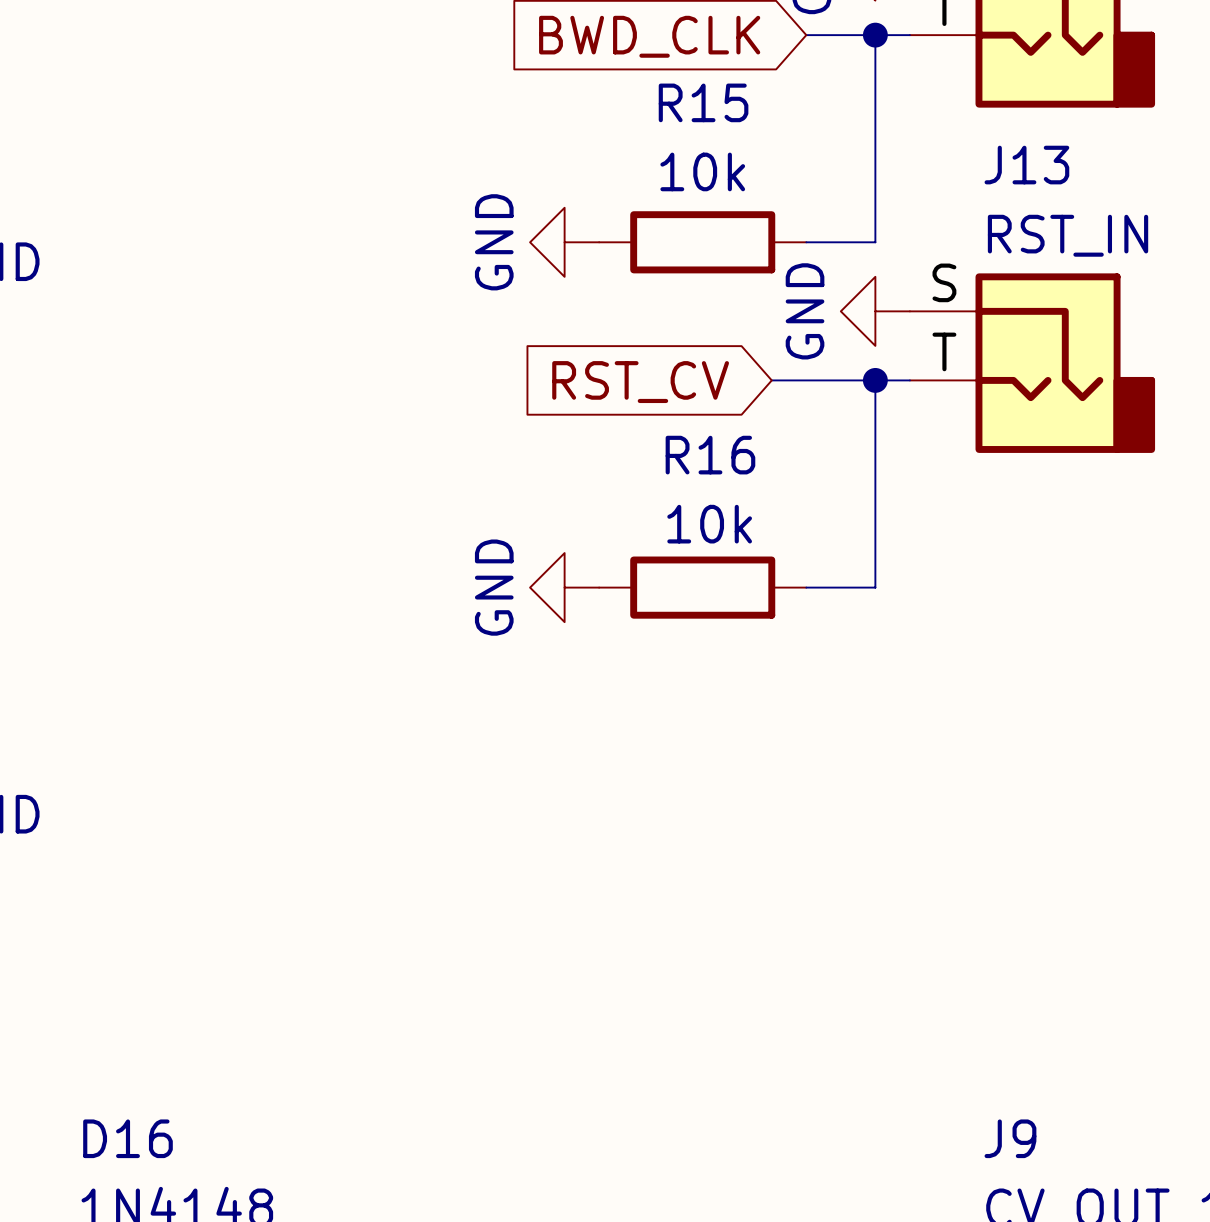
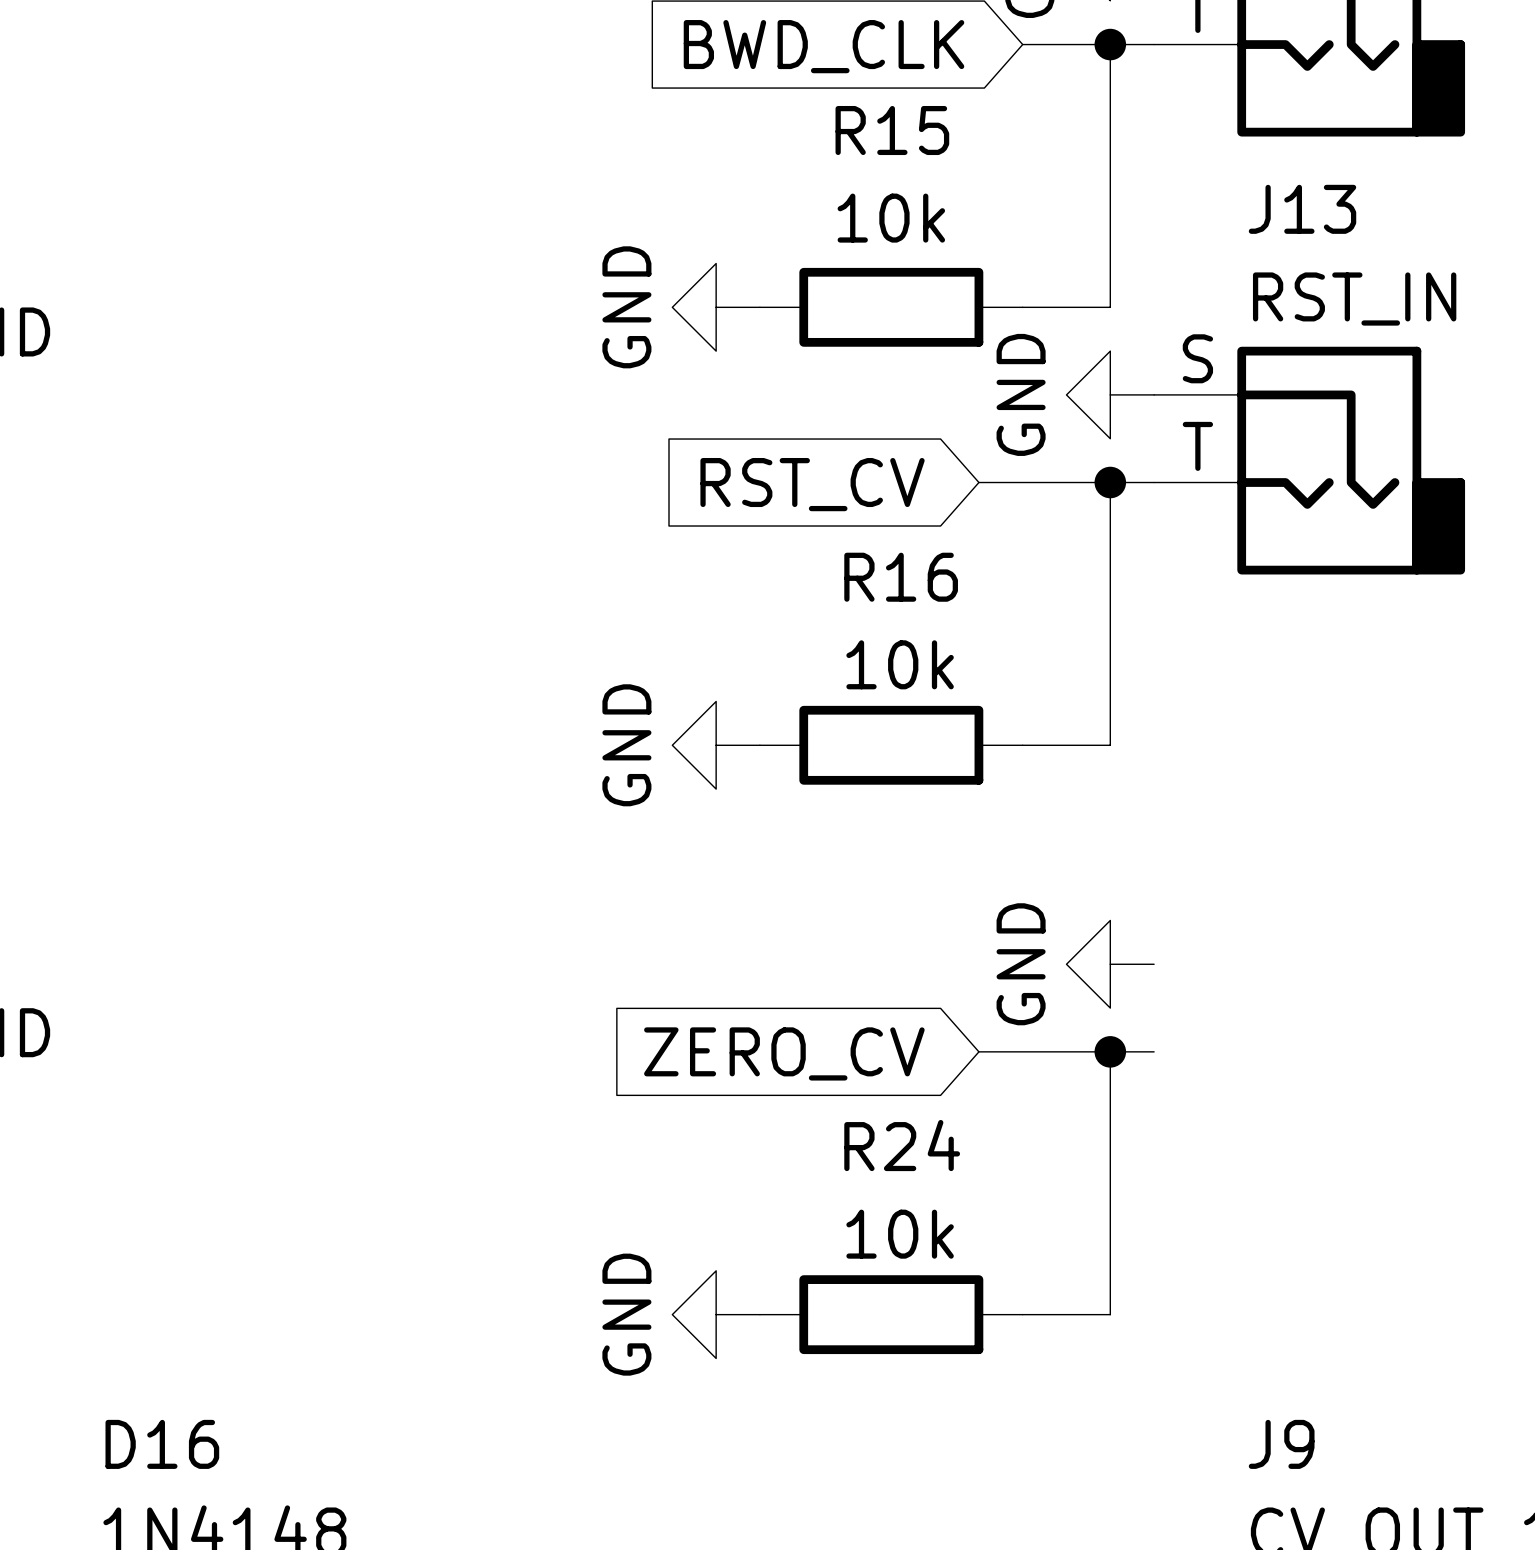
power symbol: none -> GND (1110, 964)
wire: none -> (978, 1051) (1154, 1051)
wire: none -> (1110, 1051) (1110, 1314) (1022, 1314)
junction: none -> (1110, 1051)
global label: none -> ZERO_CV (784, 1053)
power symbol: none -> GND (716, 1314)
R24: none -> 10k (891, 1314)

